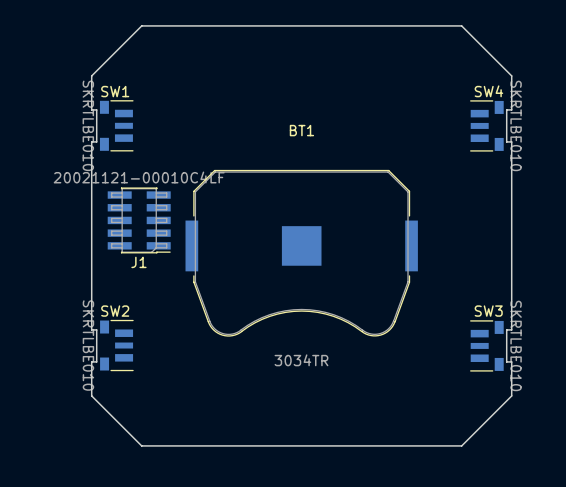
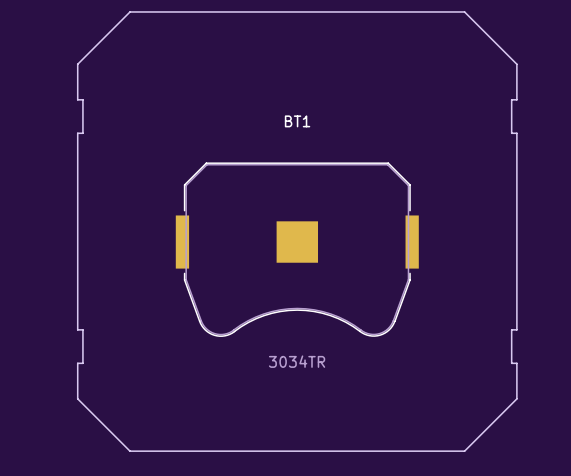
SW1: SKRTLBE010 (116, 125) -> none
SW4: SKRTLBE010 (486, 125) -> none
J1: 20021121-00010C4LF (139, 220) -> none
SW2: SKRTLBE010 (116, 345) -> none
SW3: SKRTLBE010 (486, 345) -> none

